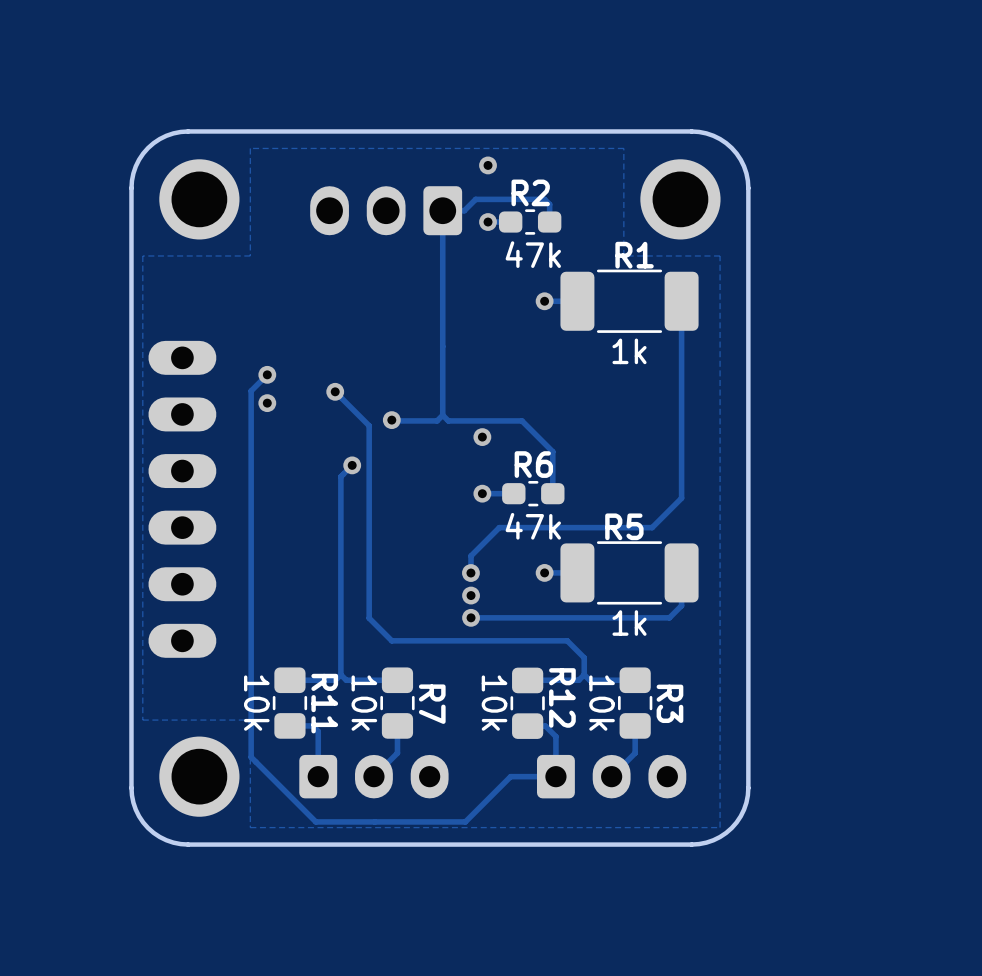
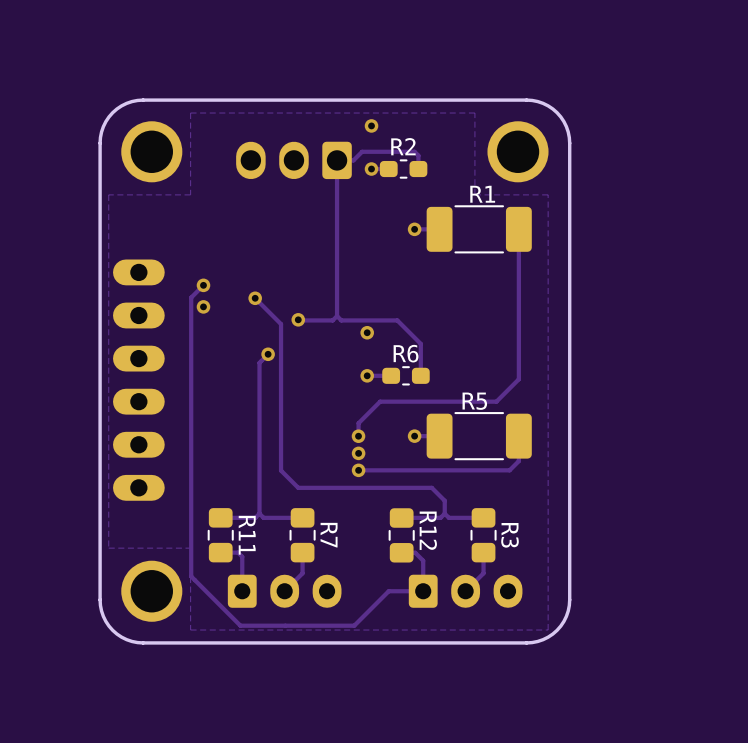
text: 47k (533, 254) -> none
text: 1k (629, 351) -> none
text: 47k (533, 526) -> none
text: 1k (629, 623) -> none
text: 10k (256, 703) -> none
text: 10k (364, 703) -> none
text: 10k (494, 703) -> none
text: 10k (602, 703) -> none

